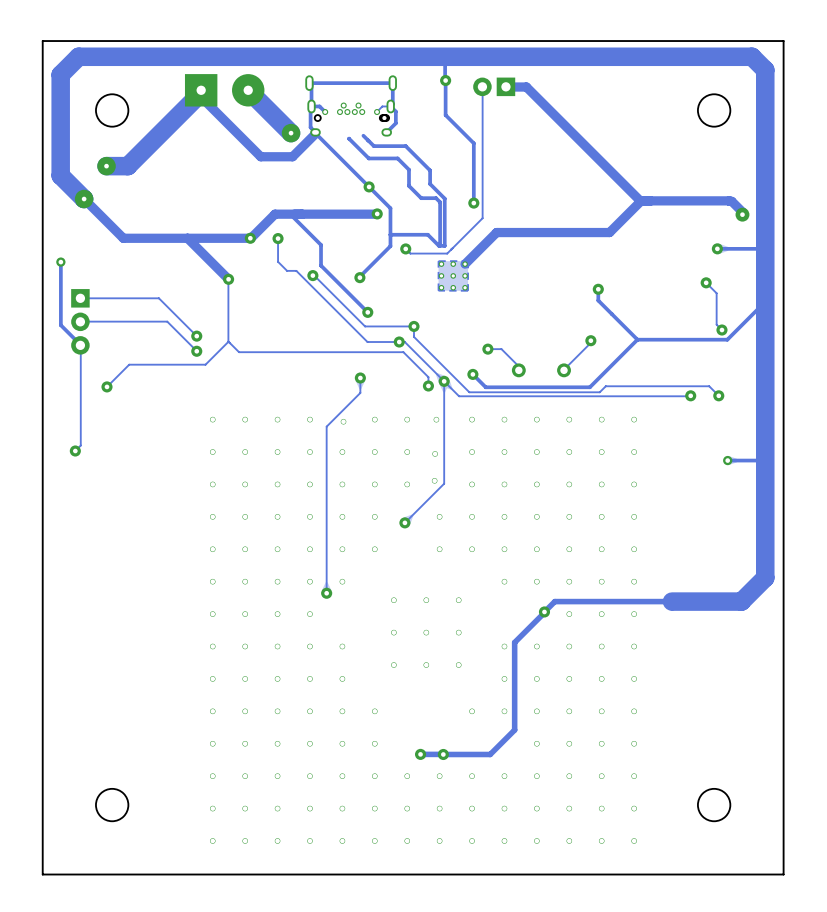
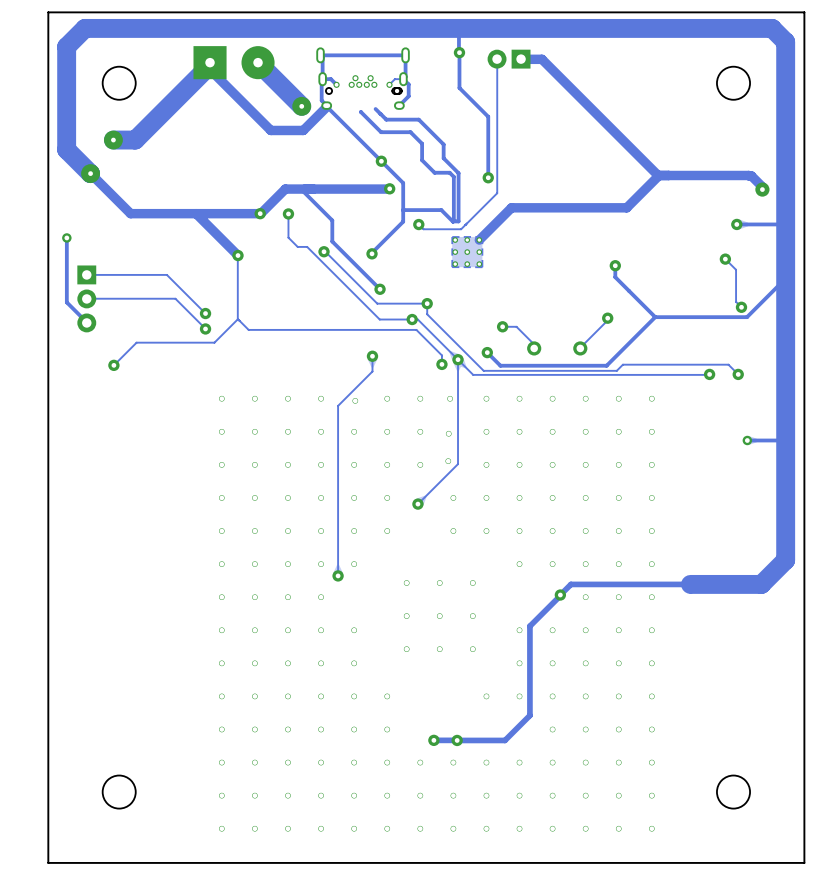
track: (80, 345) (80, 445) (75, 450) -> none
via: (75, 450) -> none

